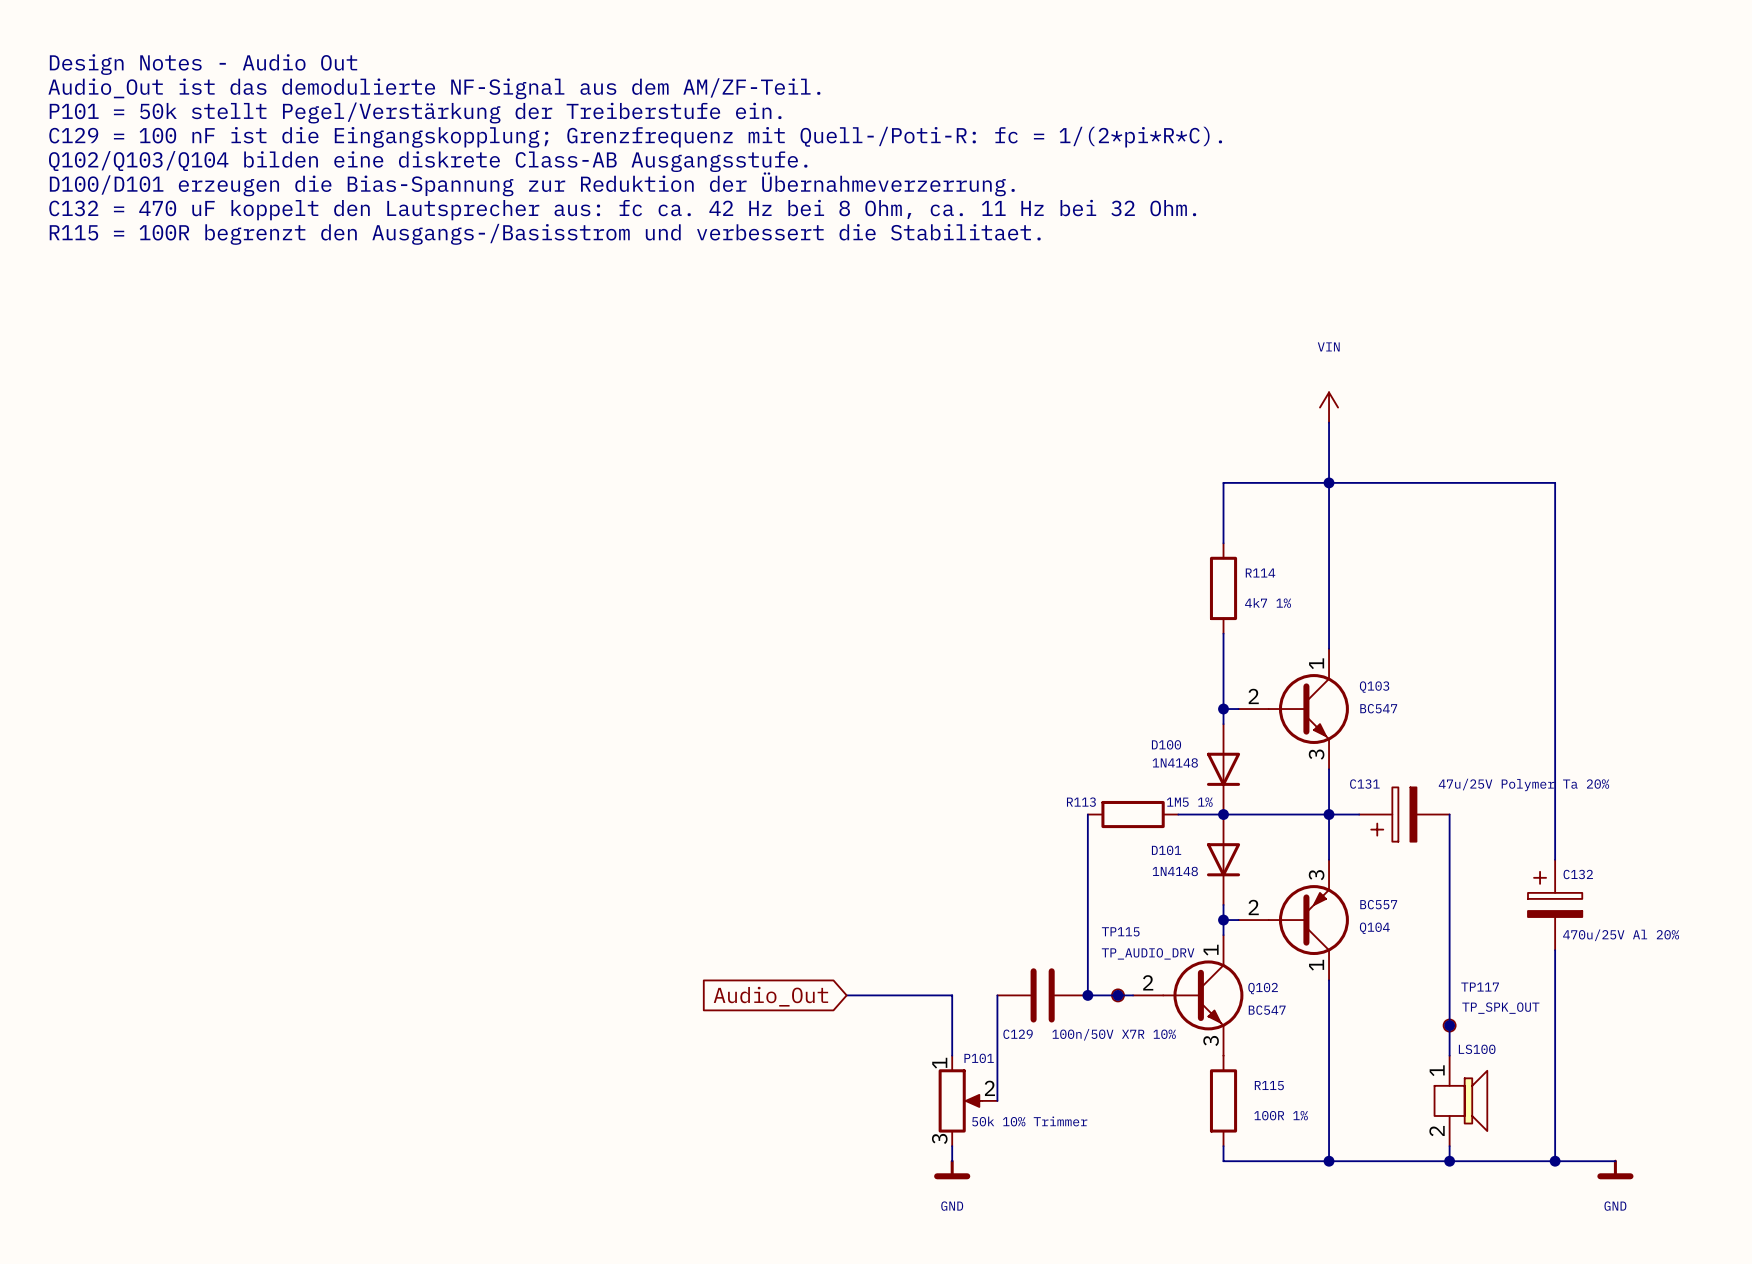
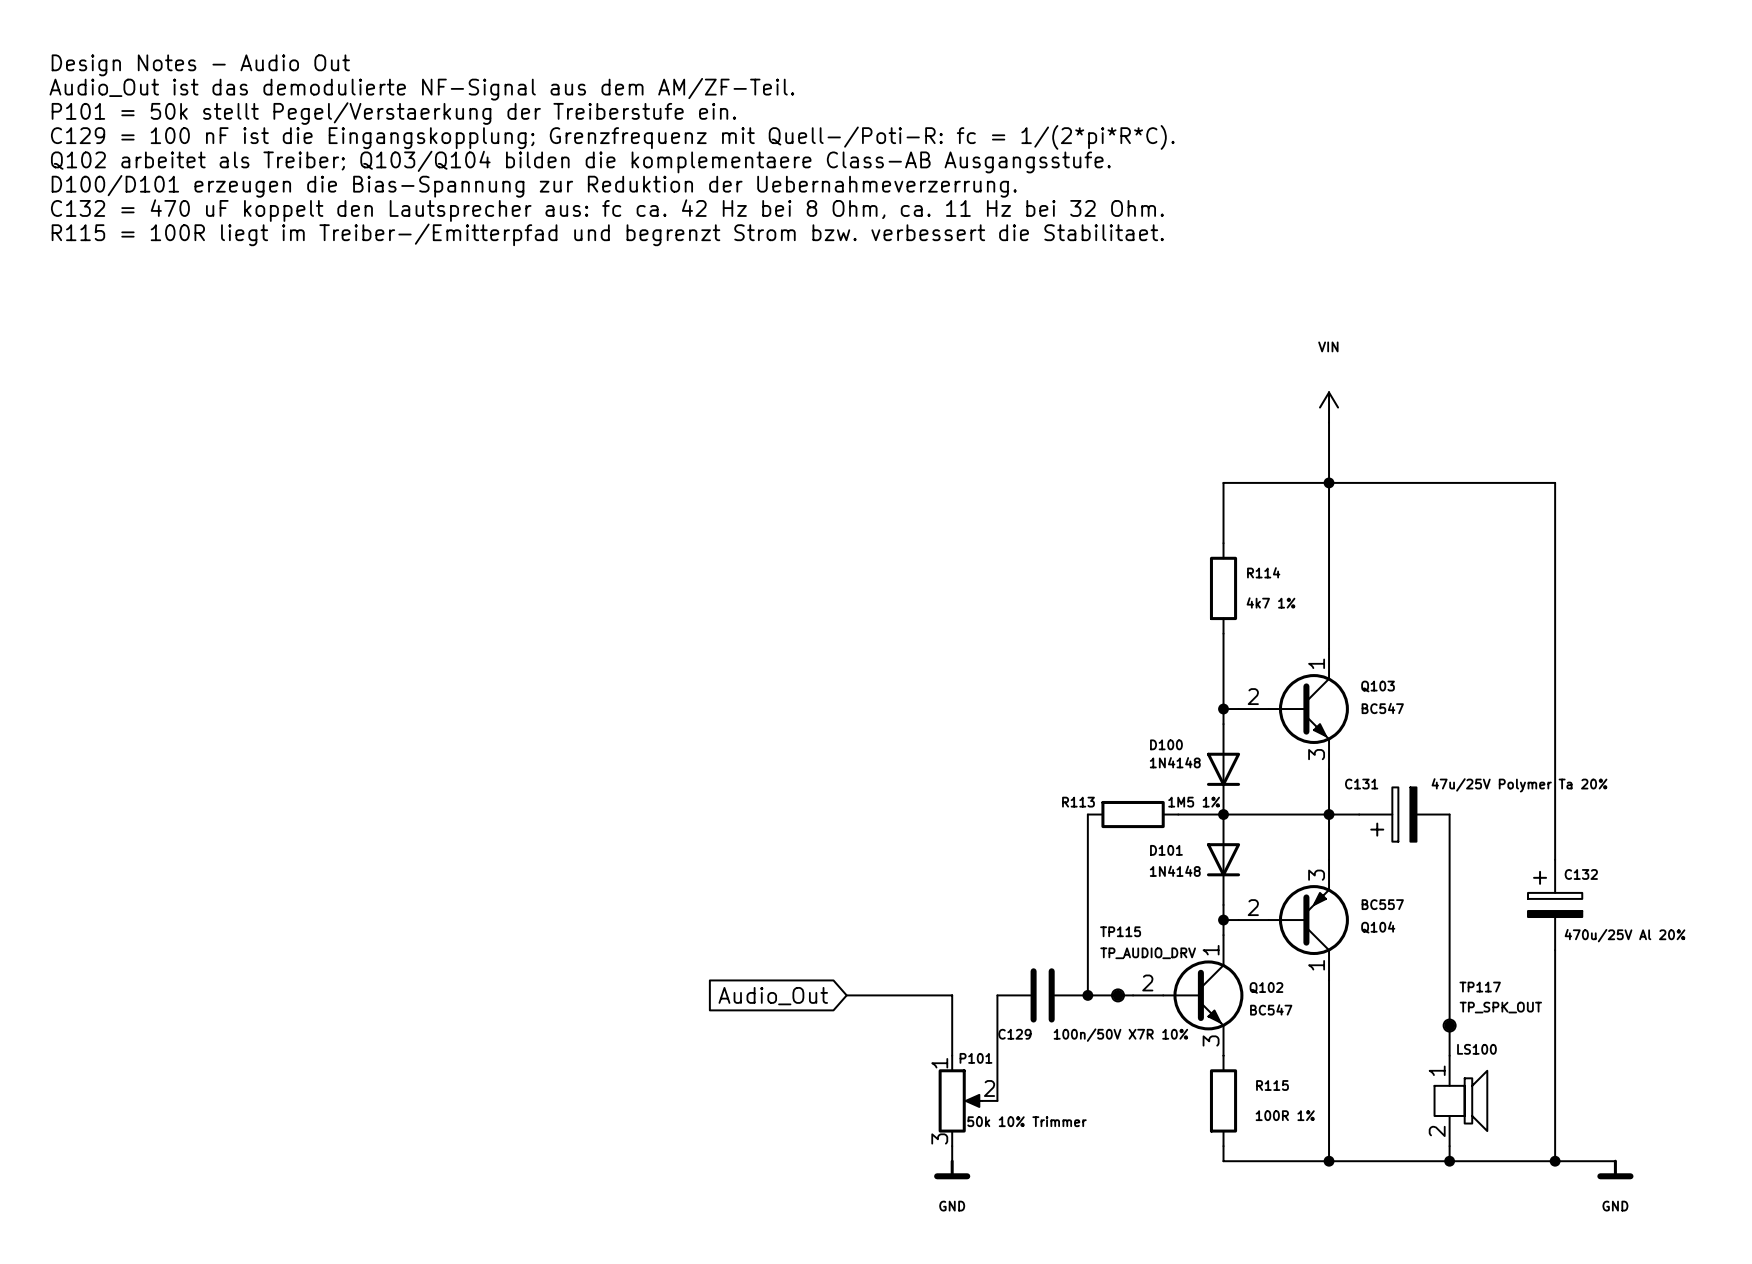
text: P101 = 50k stellt Pegel/Verstärkung der Treiberstufe ein. (415, 112) -> P101 = 50k stellt Pegel/Verstaerkung der Treiberstufe ein. (393, 113)
text: Q102/Q103/Q104 bilden eine diskrete Class-AB Ausgangsstufe. (428, 161) -> Q102 arbeitet als Treiber; Q103/Q104 bilden die komplementaere Class-AB Ausgangsstufe. (580, 162)
text: D100/D101 erzeugen die Bias-Spannung zur Reduktion der Übernahmeverzerrung. (532, 184) -> D100/D101 erzeugen die Bias-Spannung zur Reduktion der Uebernahmeverzerrung. (534, 186)
text: R115 = 100R begrenzt den Ausgangs-/Basisstrom und verbessert die Stabilitaet. (545, 234) -> R115 = 100R liegt im Treiber-/Emitterpfad und begrenzt Strom bzw. verbessert die Stabilitaet. (607, 234)

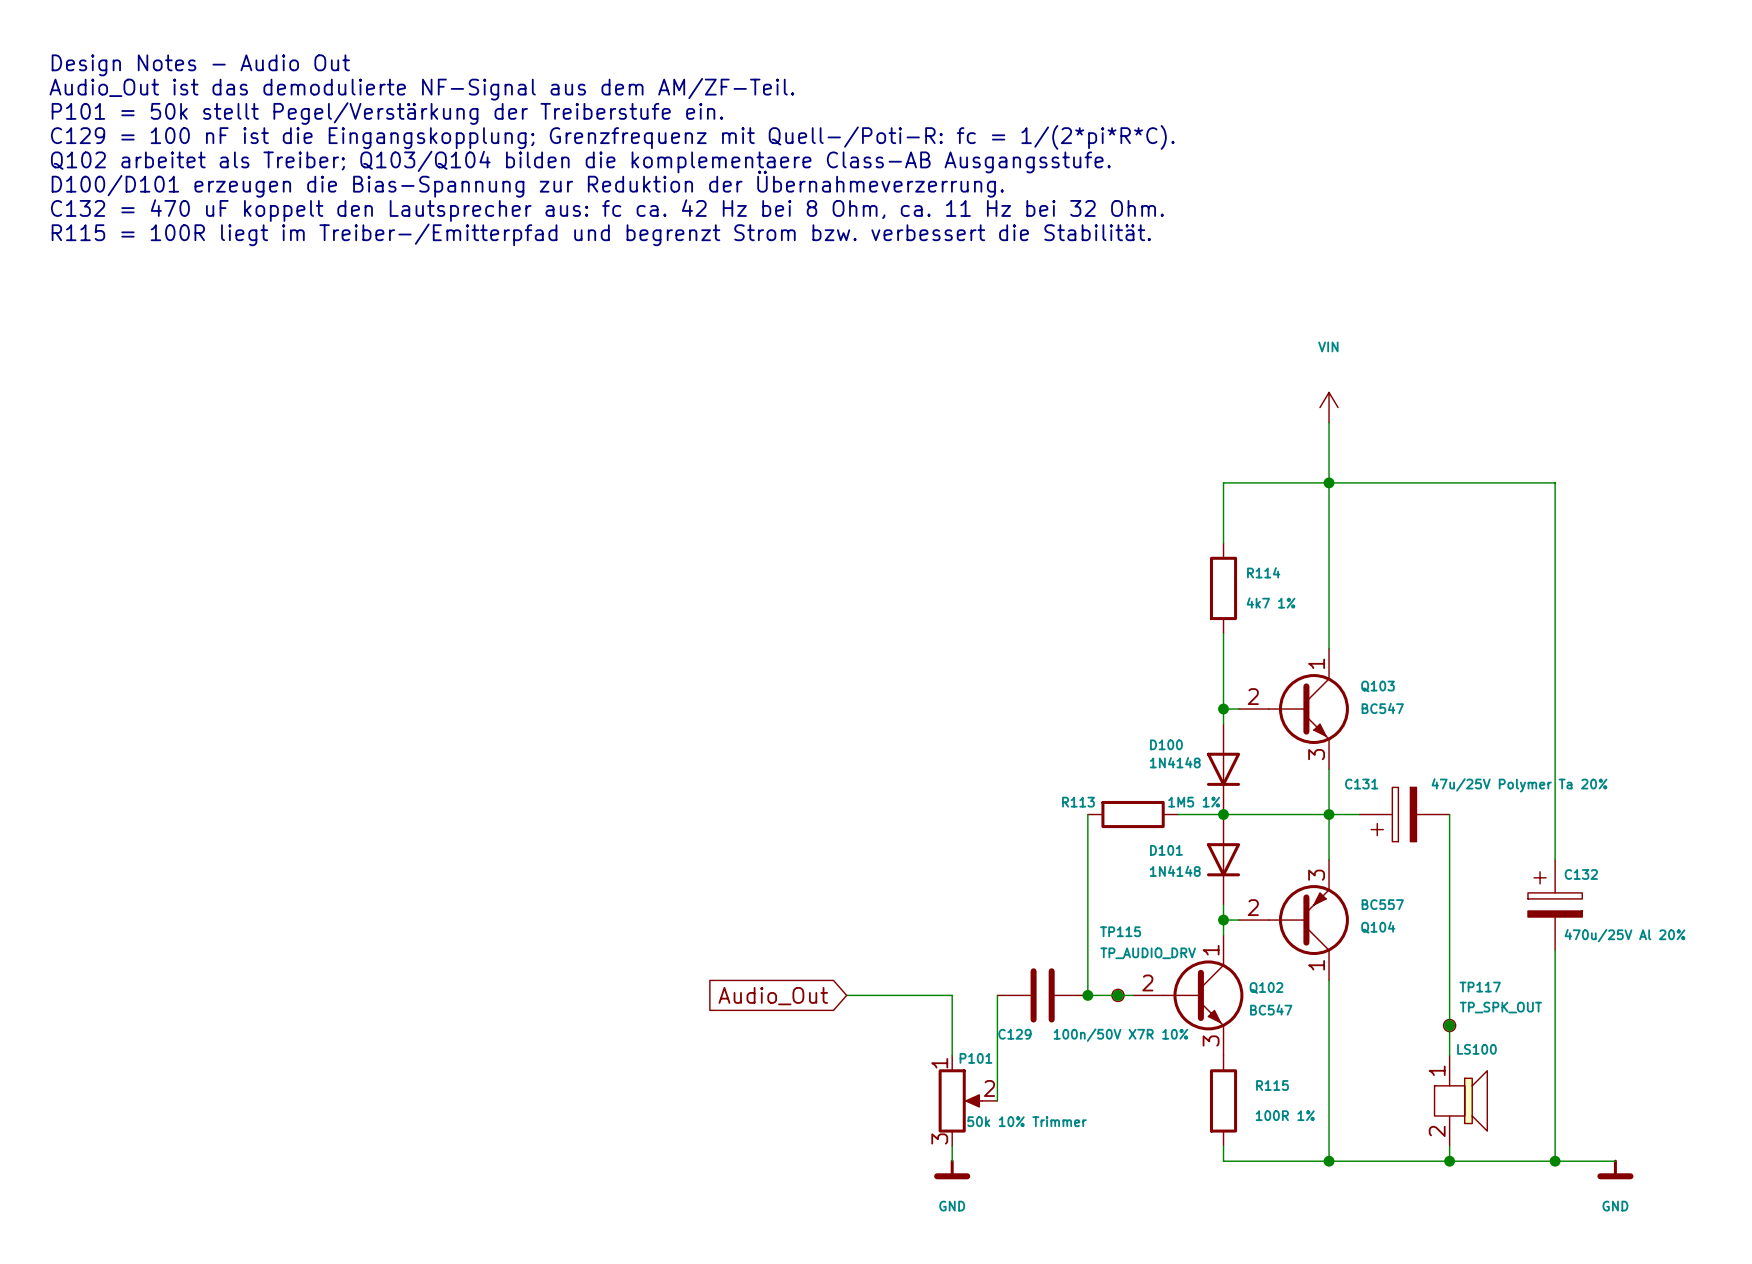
text: P101 = 50k stellt Pegel/Verstaerkung der Treiberstufe ein. (393, 113) -> P101 = 50k stellt Pegel/Verstärkung der Treiberstufe ein. (387, 113)
text: D100/D101 erzeugen die Bias-Spannung zur Reduktion der Uebernahmeverzerrung. (534, 186) -> D100/D101 erzeugen die Bias-Spannung zur Reduktion der Übernahmeverzerrung. (527, 184)
text: R115 = 100R liegt im Treiber-/Emitterpfad und begrenzt Strom bzw. verbessert die Stabilitaet. (607, 234) -> R115 = 100R liegt im Treiber-/Emitterpfad und begrenzt Strom bzw. verbessert die Stabilität. (601, 234)

